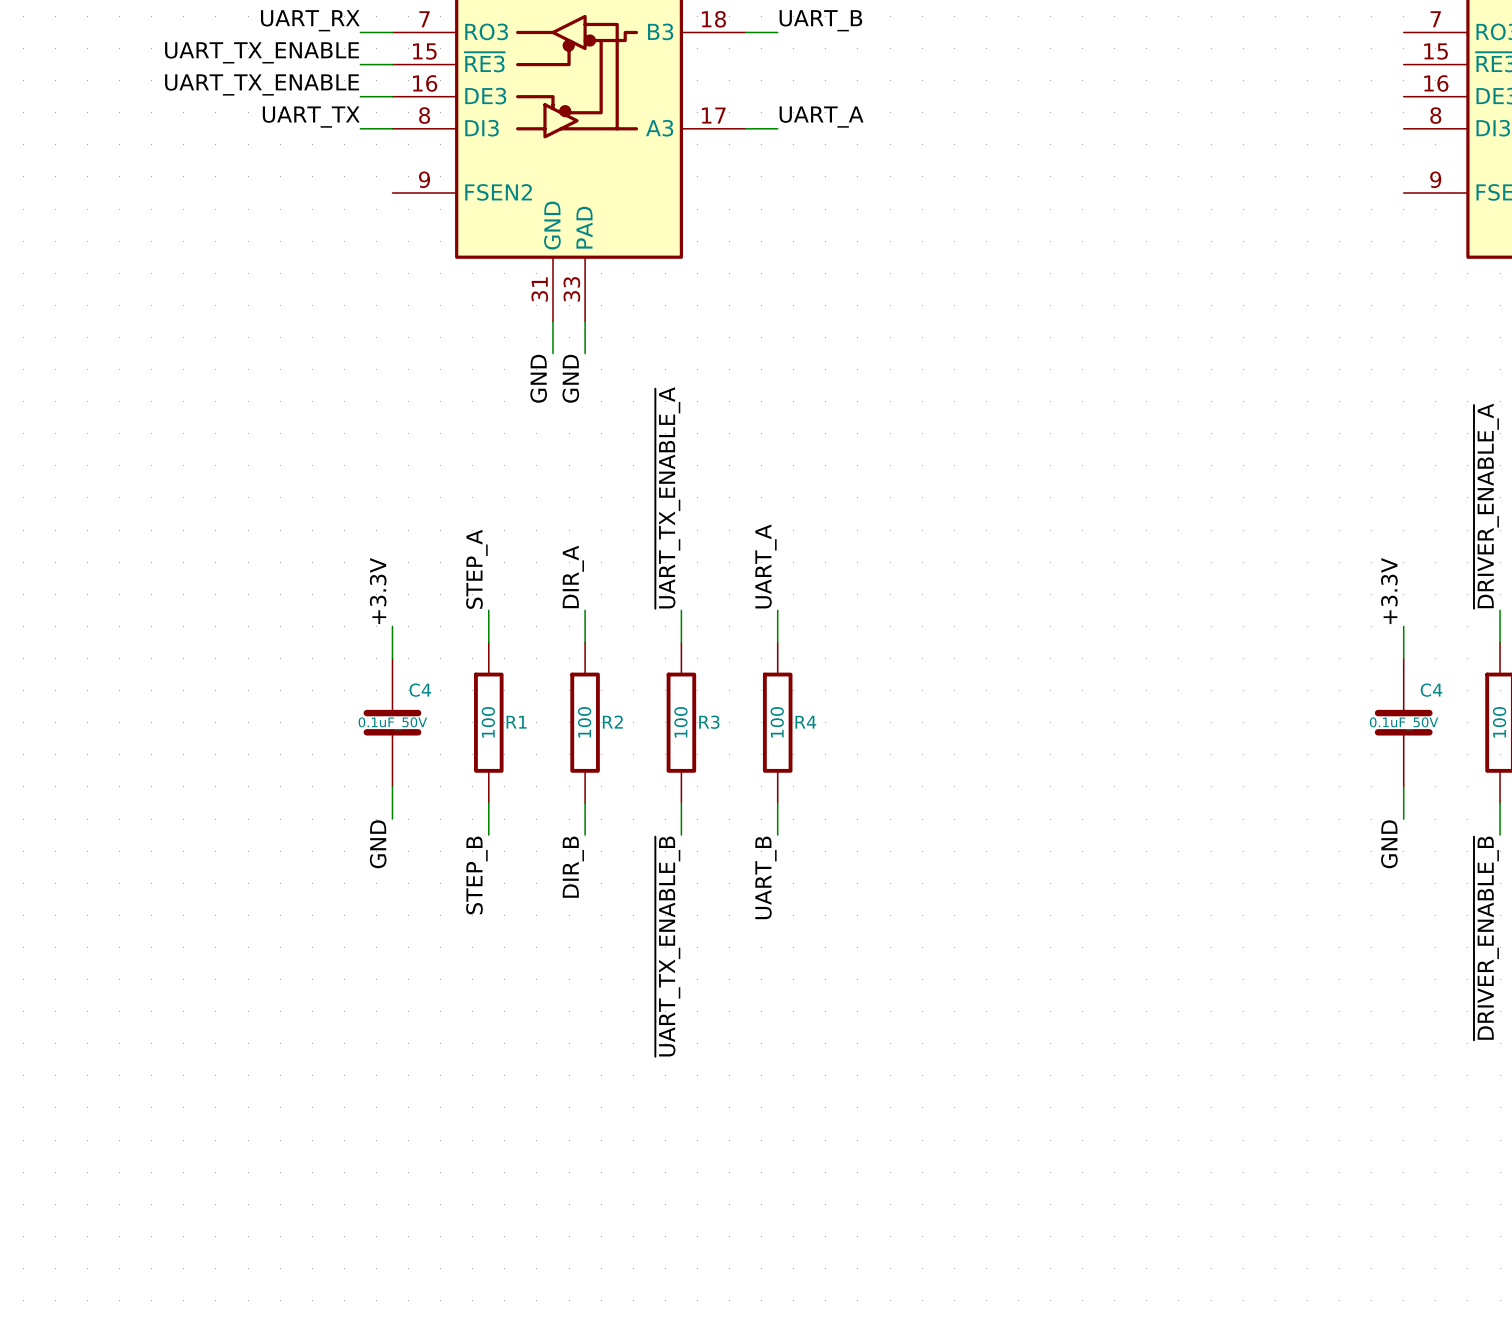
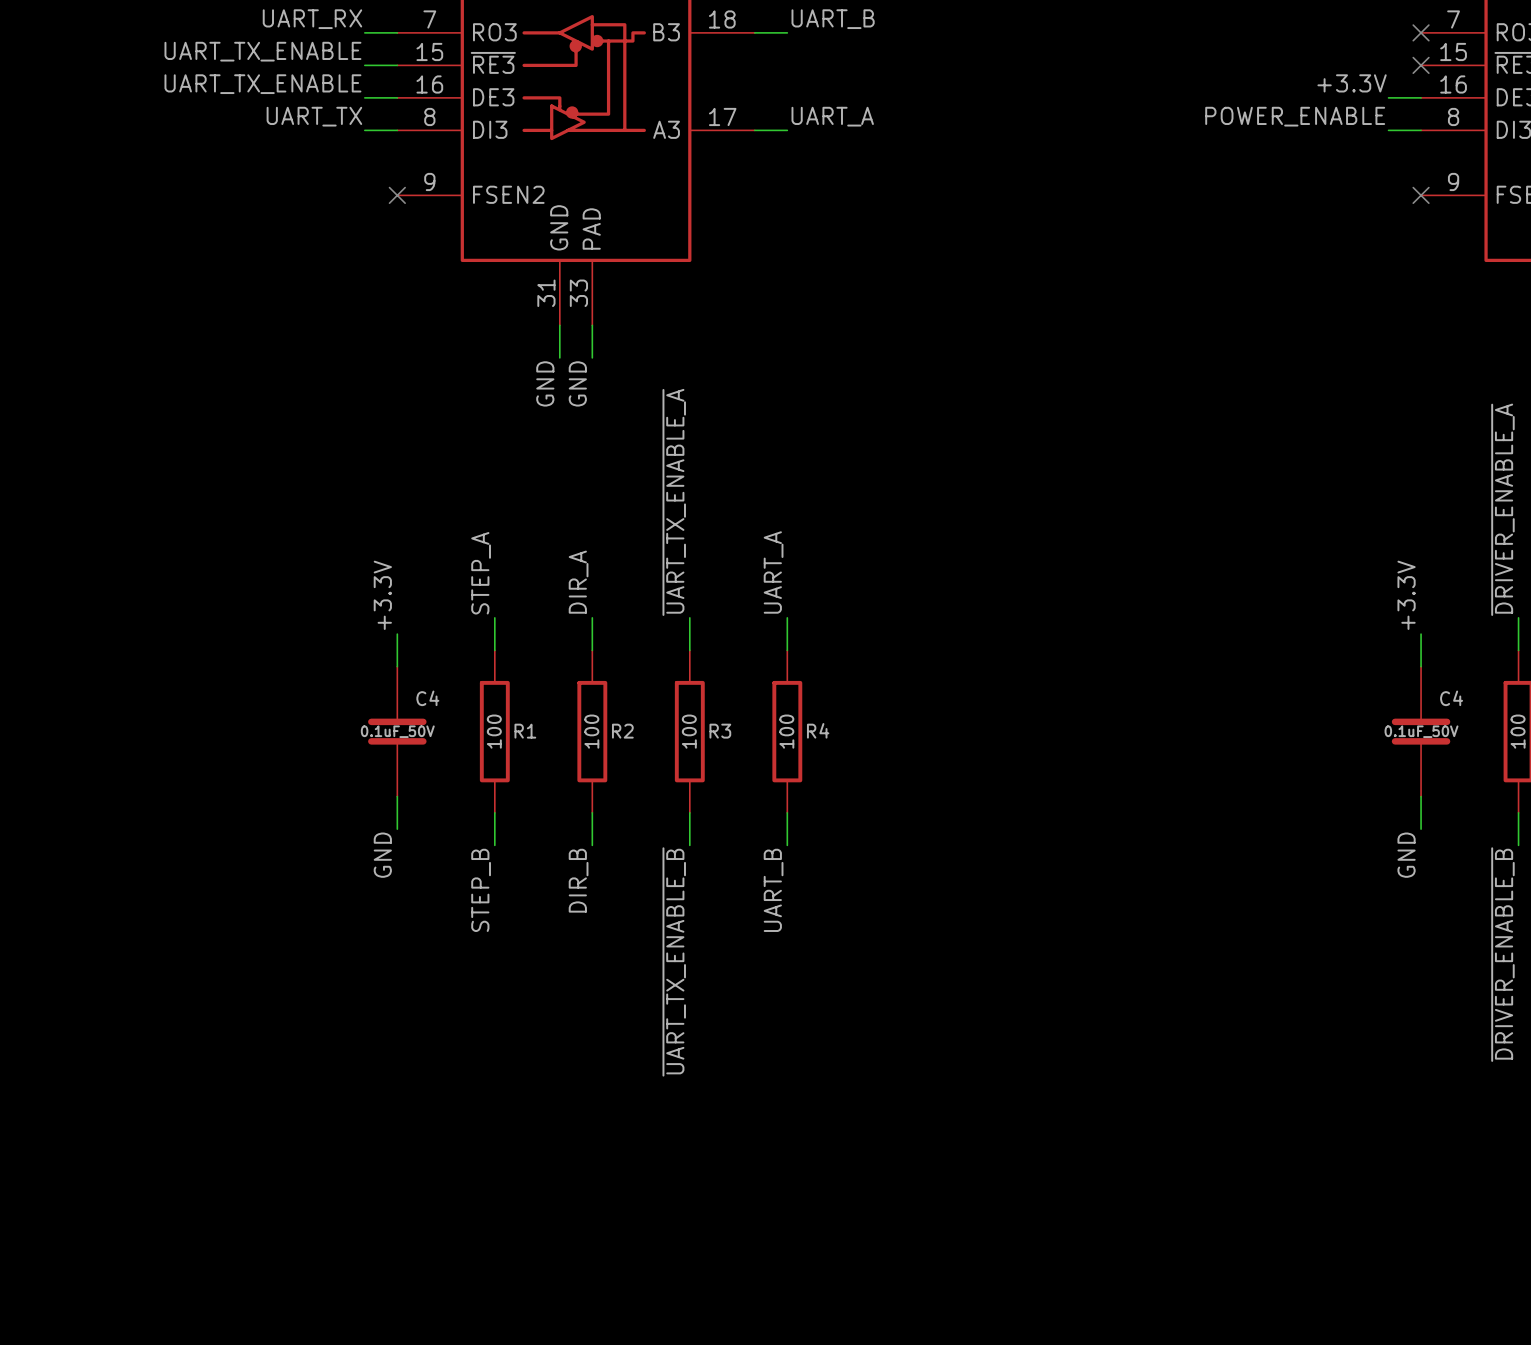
no-connect mark: none -> (1421, 32)
no-connect mark: none -> (1421, 65)
label: none -> +3.3V (1352, 83)
wire: none -> (1388, 97) (1421, 97)
label: none -> POWER_ENABLE (1295, 116)
wire: none -> (1388, 130) (1421, 130)
no-connect mark: none -> (397, 195)
no-connect mark: none -> (1421, 195)

